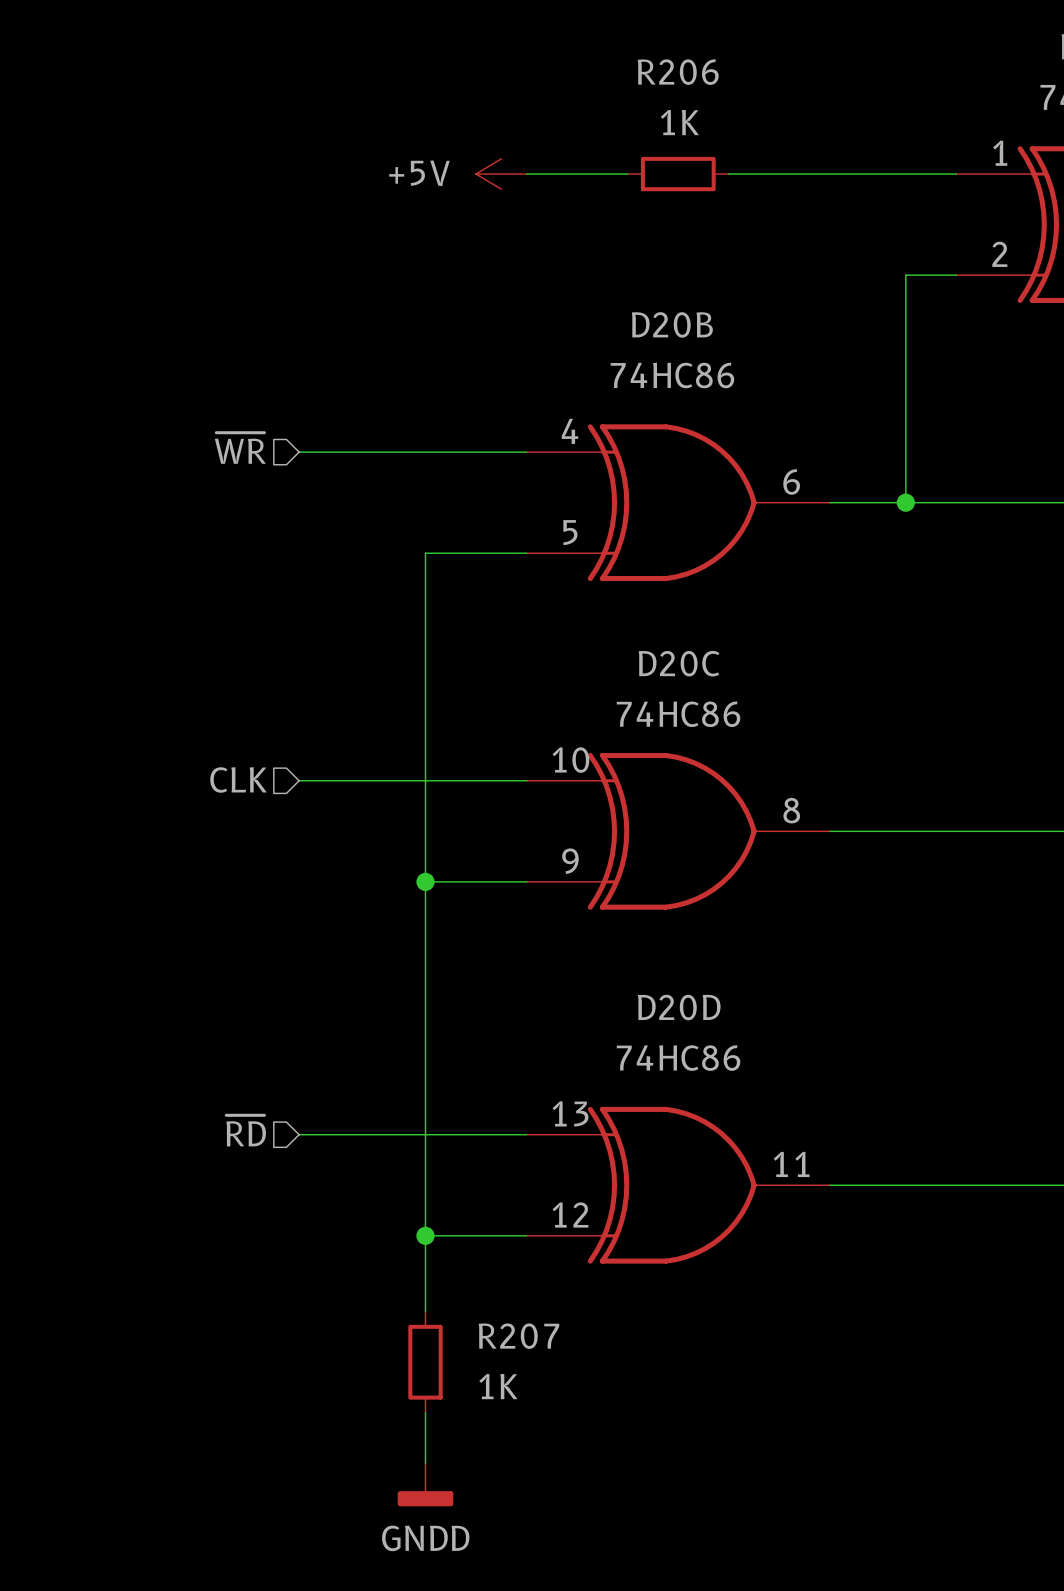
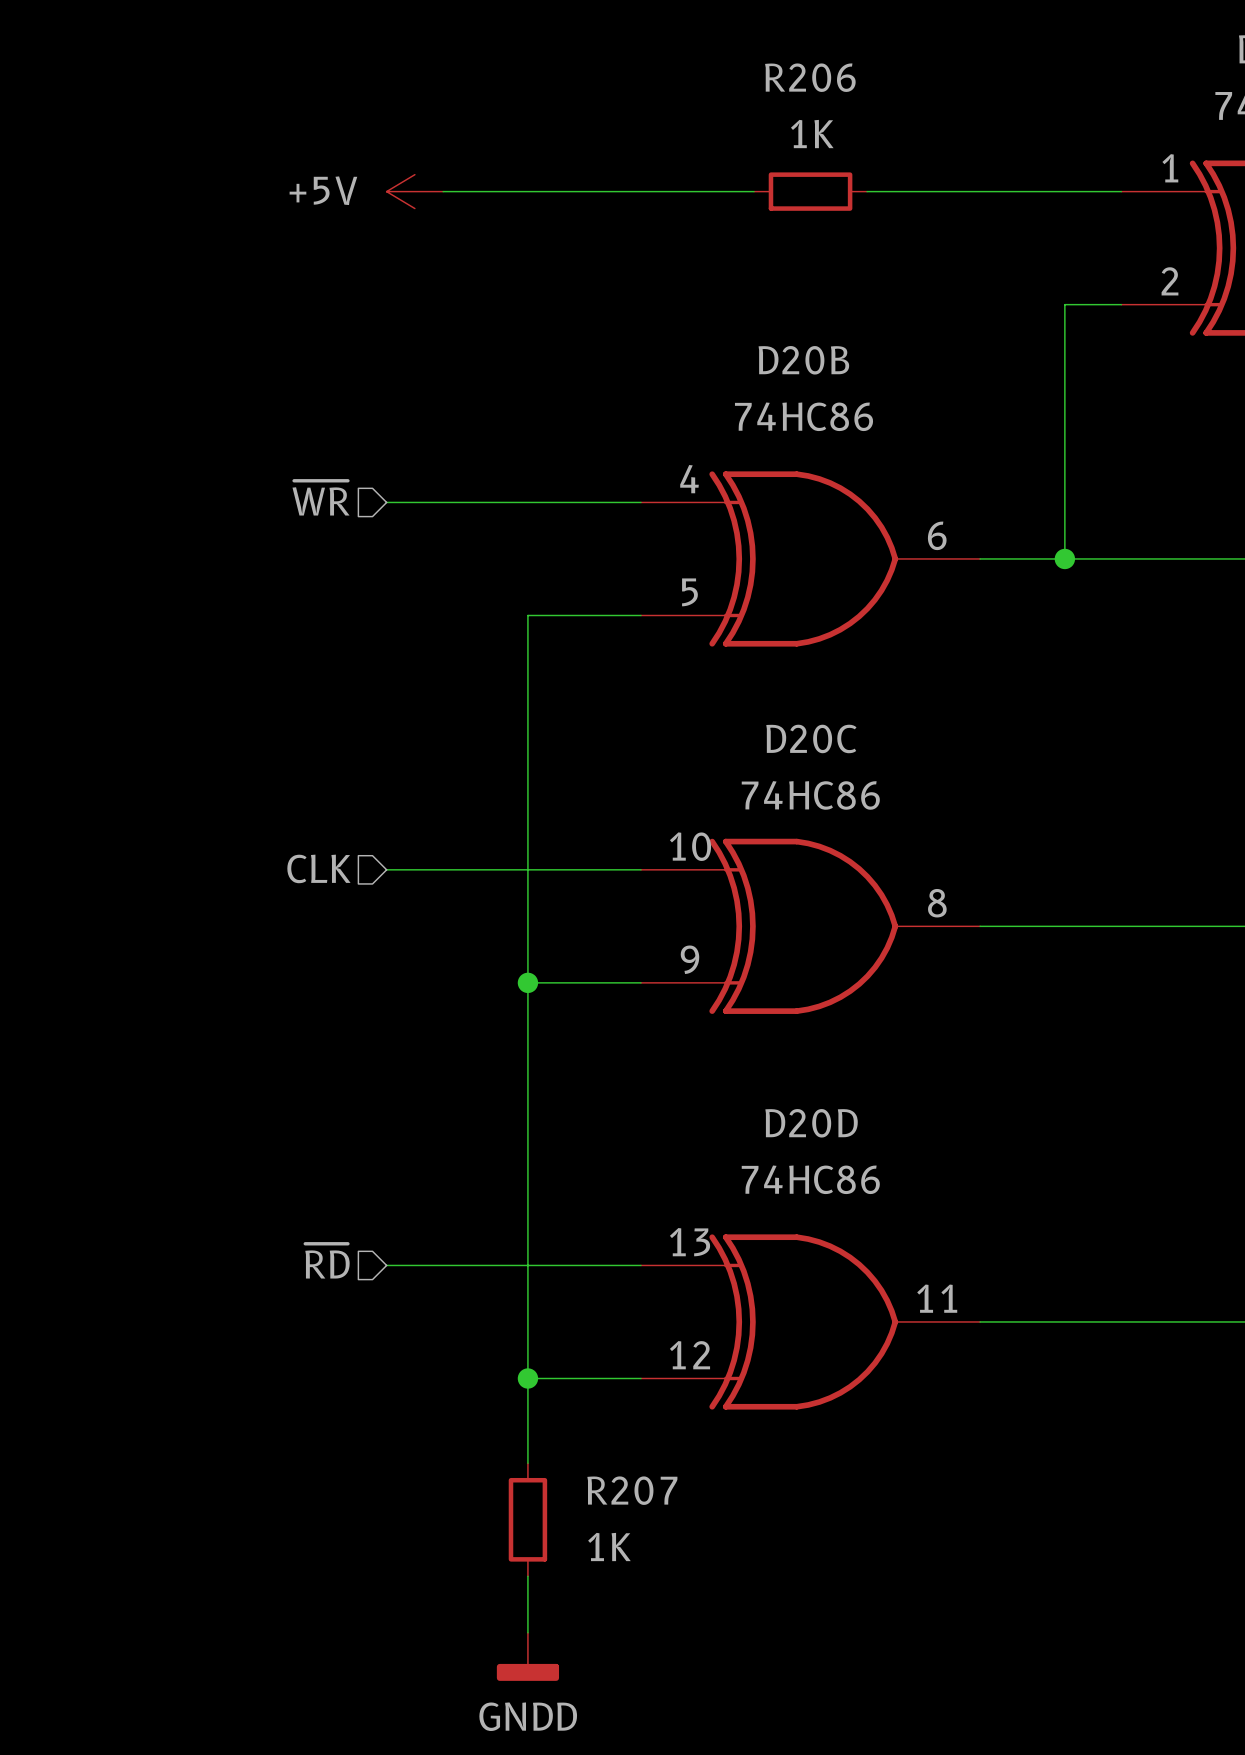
wire: none -> (443, 191) (640, 191)
power symbol position: +5V (501, 174) -> +5V (414, 191)

